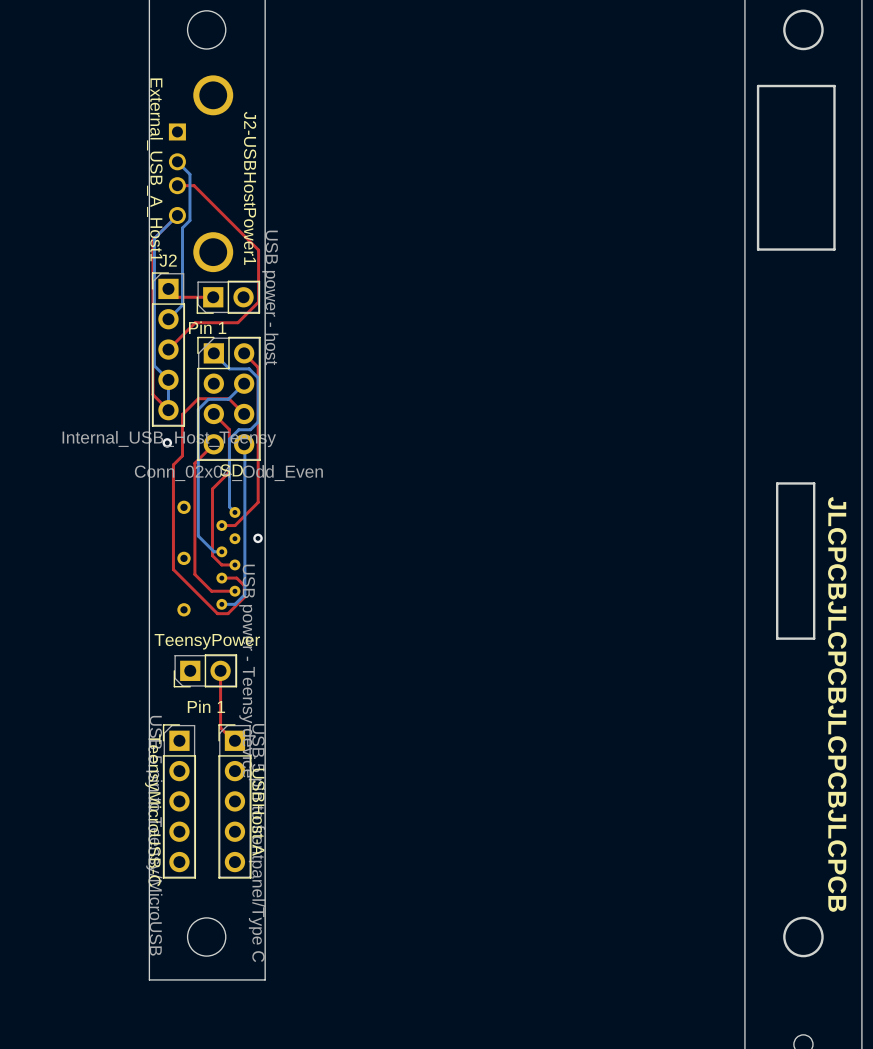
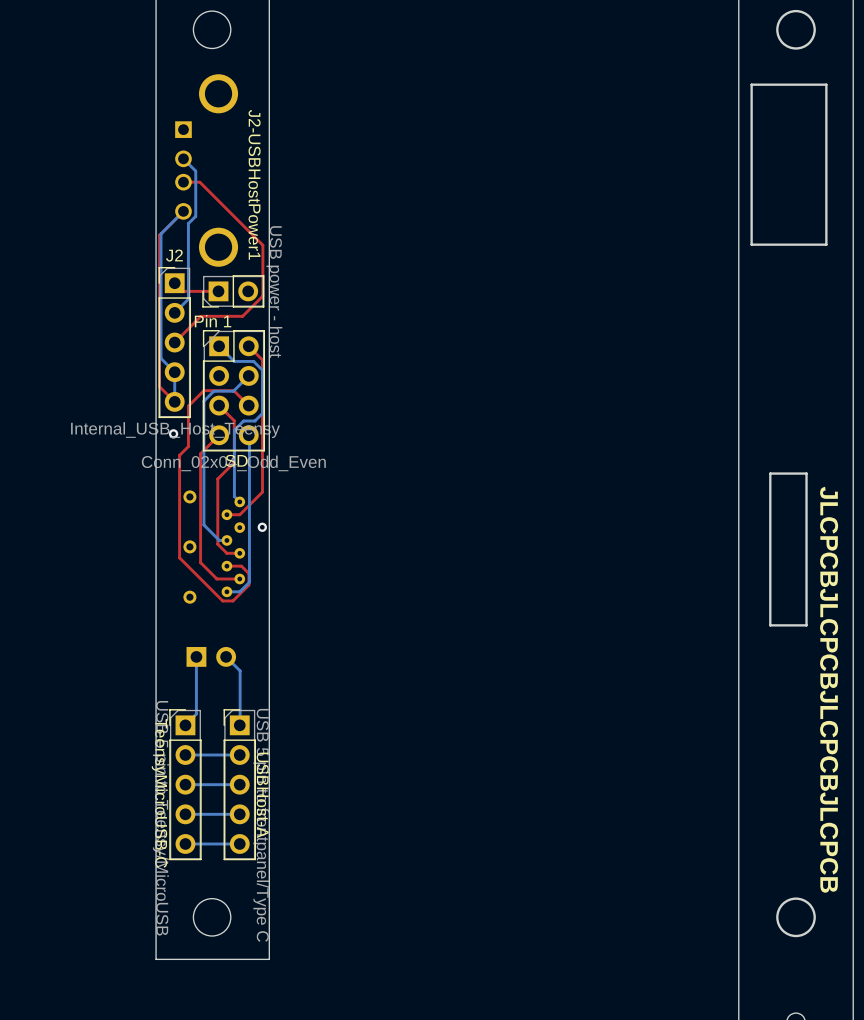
External_USB_A_Host1 name: External_USB_A_Host1 (154, 169) -> none
bottom track: none -> (196, 656) (196, 714) (185, 725)
TeensyPower side: bottom (205, 670) -> top (211, 656)
bottom track: none -> (226, 656) (240, 670) (240, 725)
top track: (220, 670) (220, 727) (234, 741) -> none
text: Pin 1 (206, 706) -> none
bottom track: none -> (240, 755) (185, 755)
bottom track: none -> (240, 784) (185, 784)
bottom track: none -> (240, 814) (185, 814)
bottom track: none -> (240, 843) (185, 843)

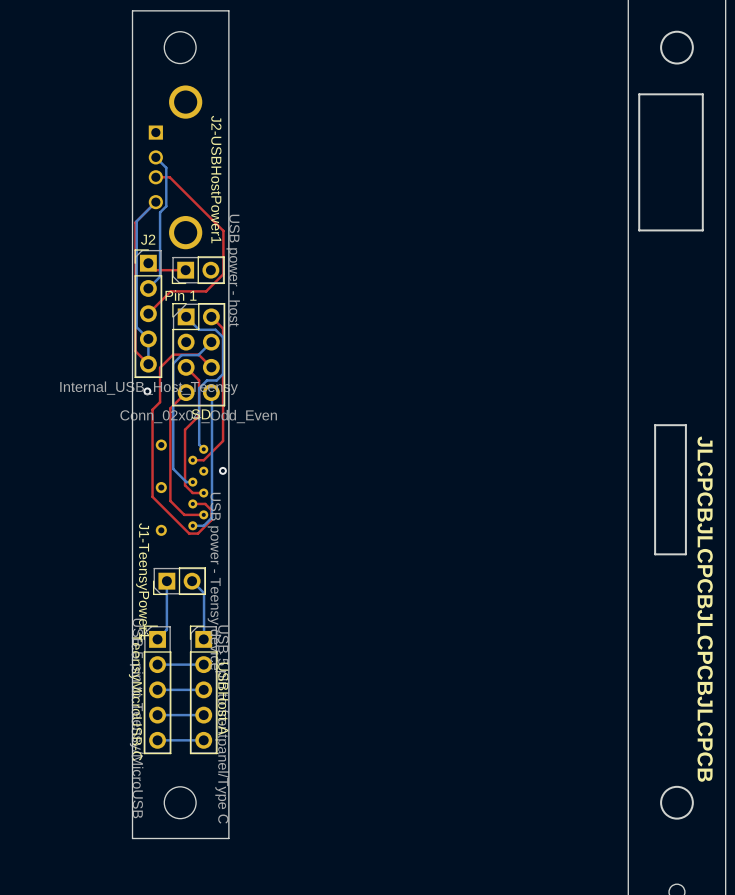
J1-TeensyPower1 side: top (211, 656) -> bottom (179, 581)

